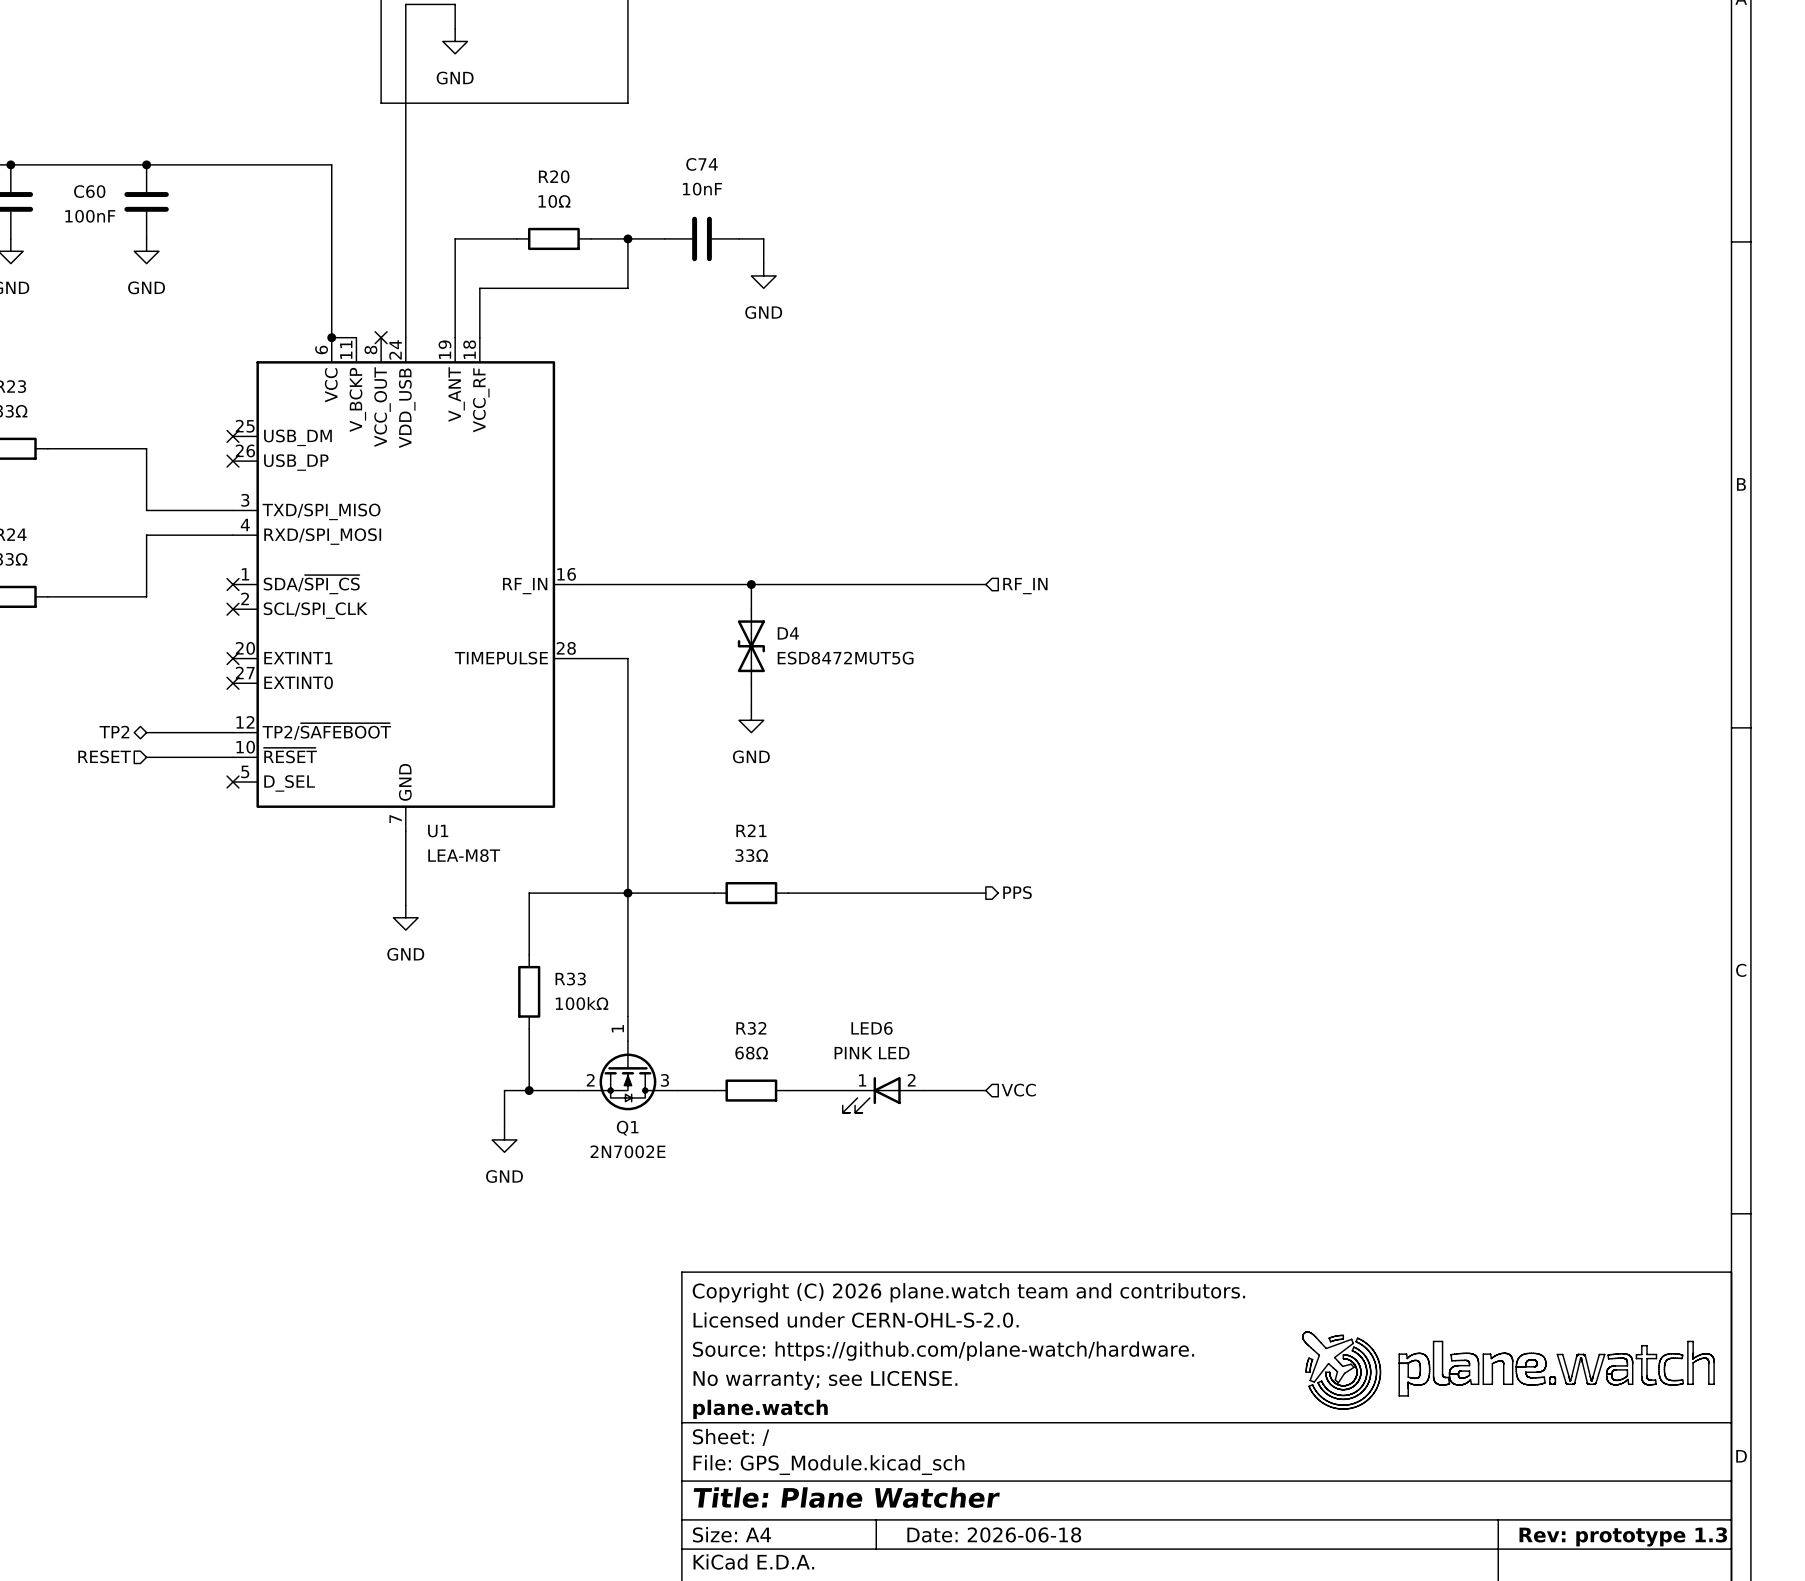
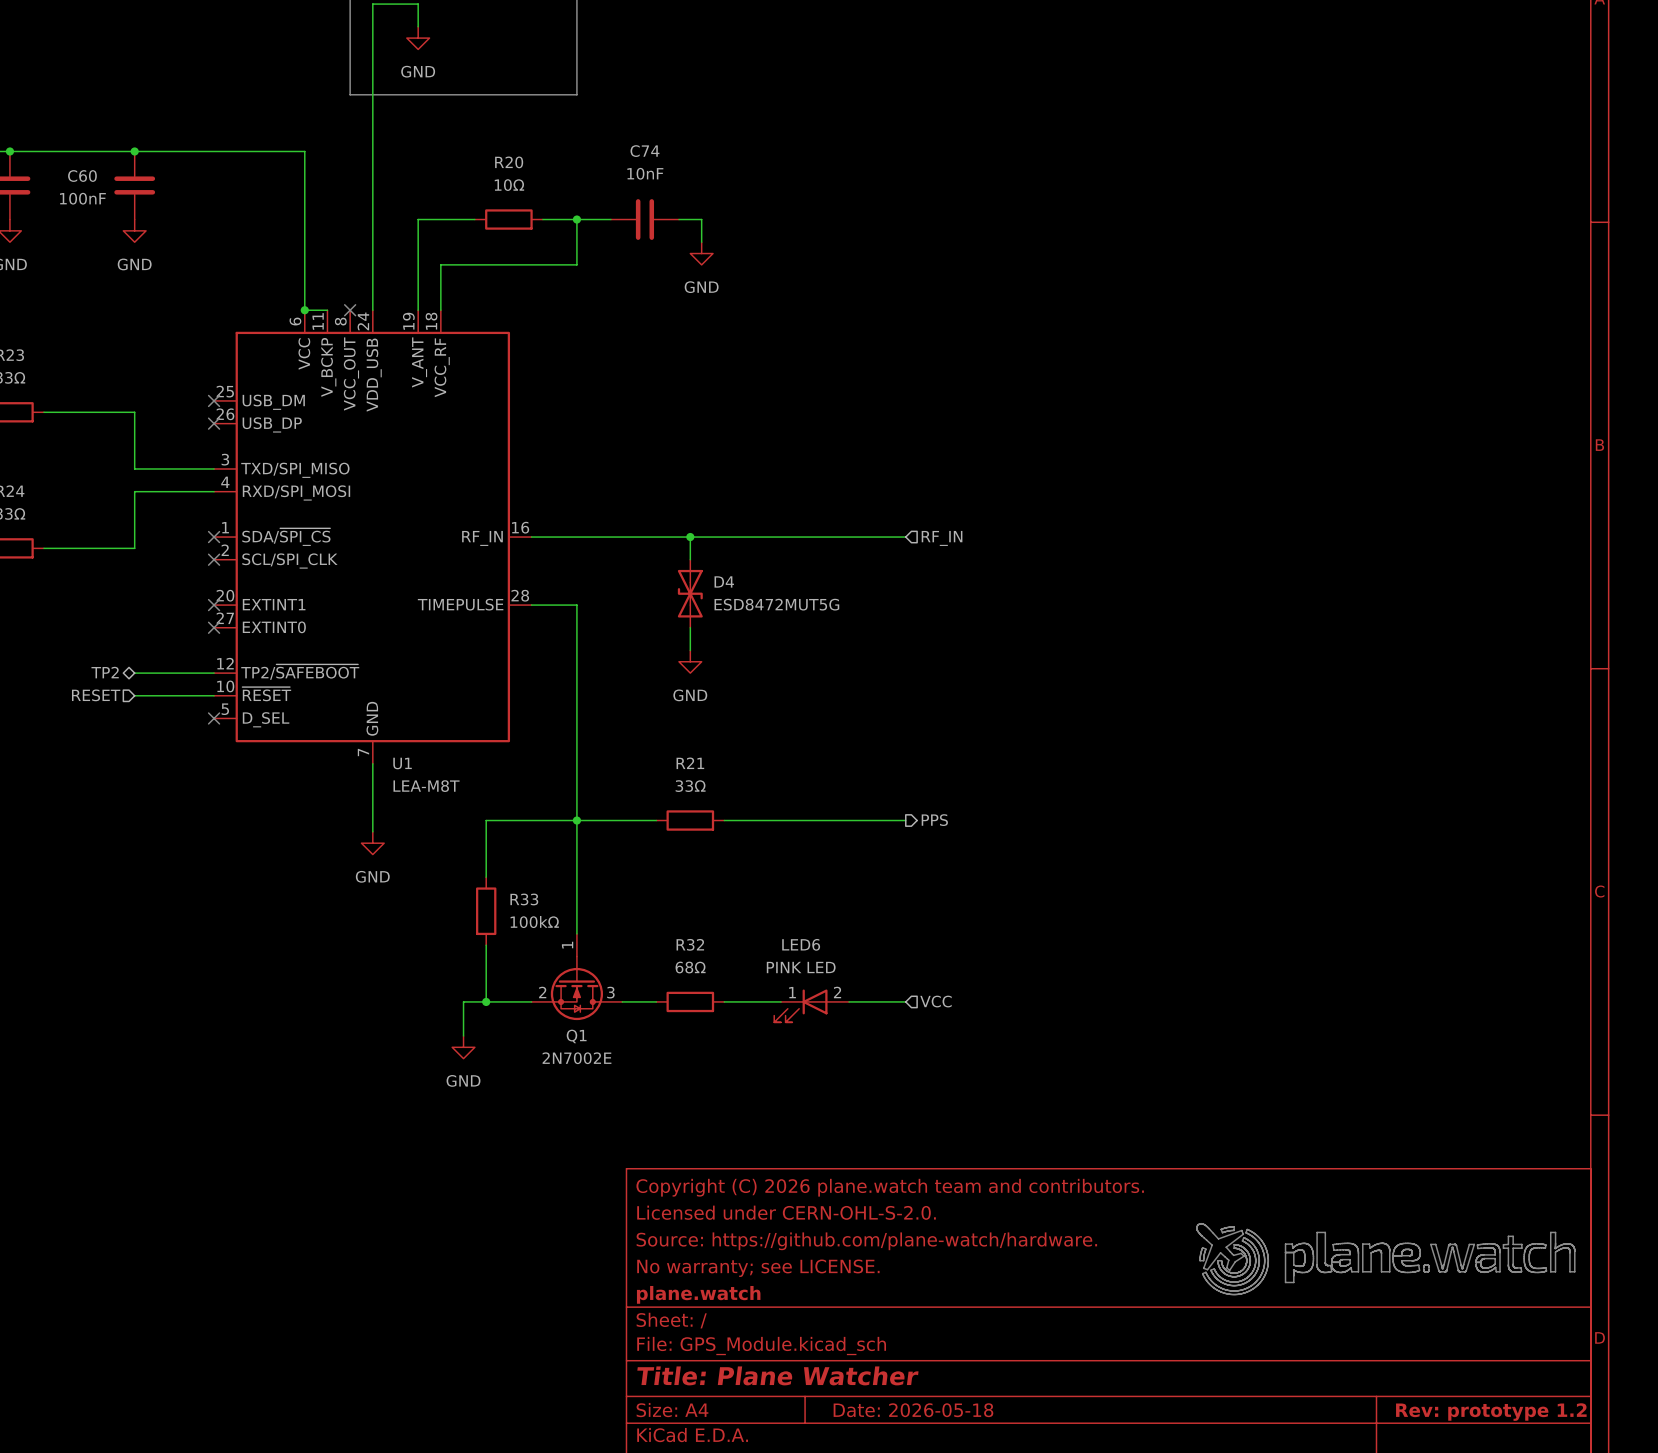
title block: Date: 2026-06-18 (994, 1534) -> Date: 2026-05-18 (913, 1410)
title block: Rev: prototype 1.3 (1623, 1536) -> Rev: prototype 1.2 (1491, 1412)

